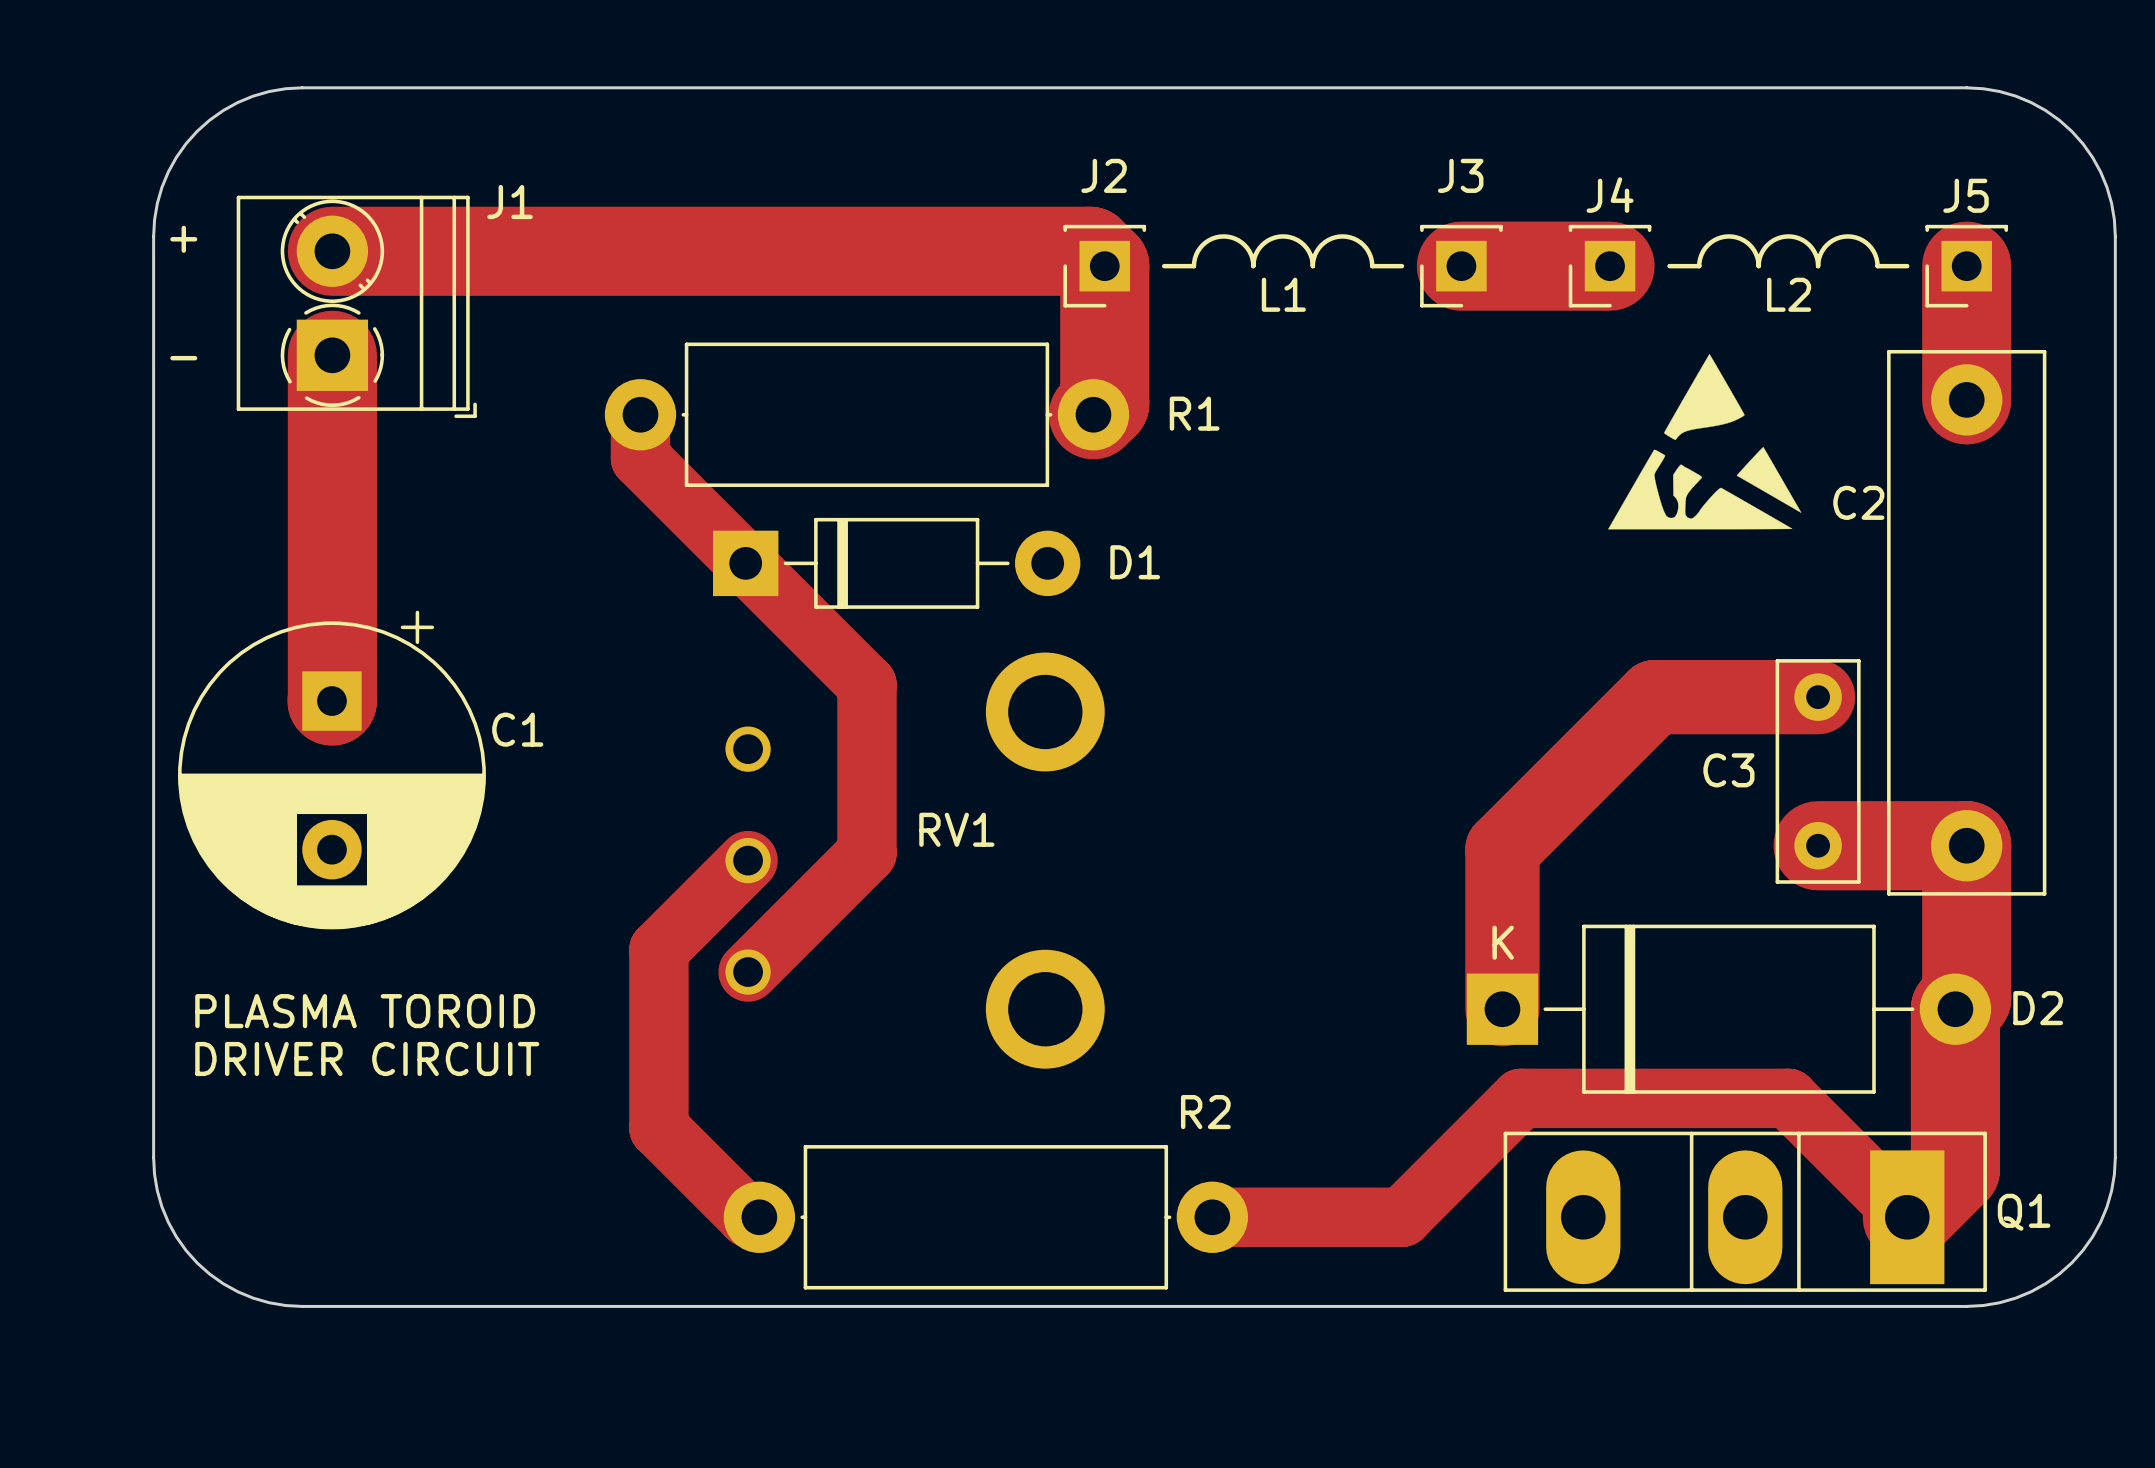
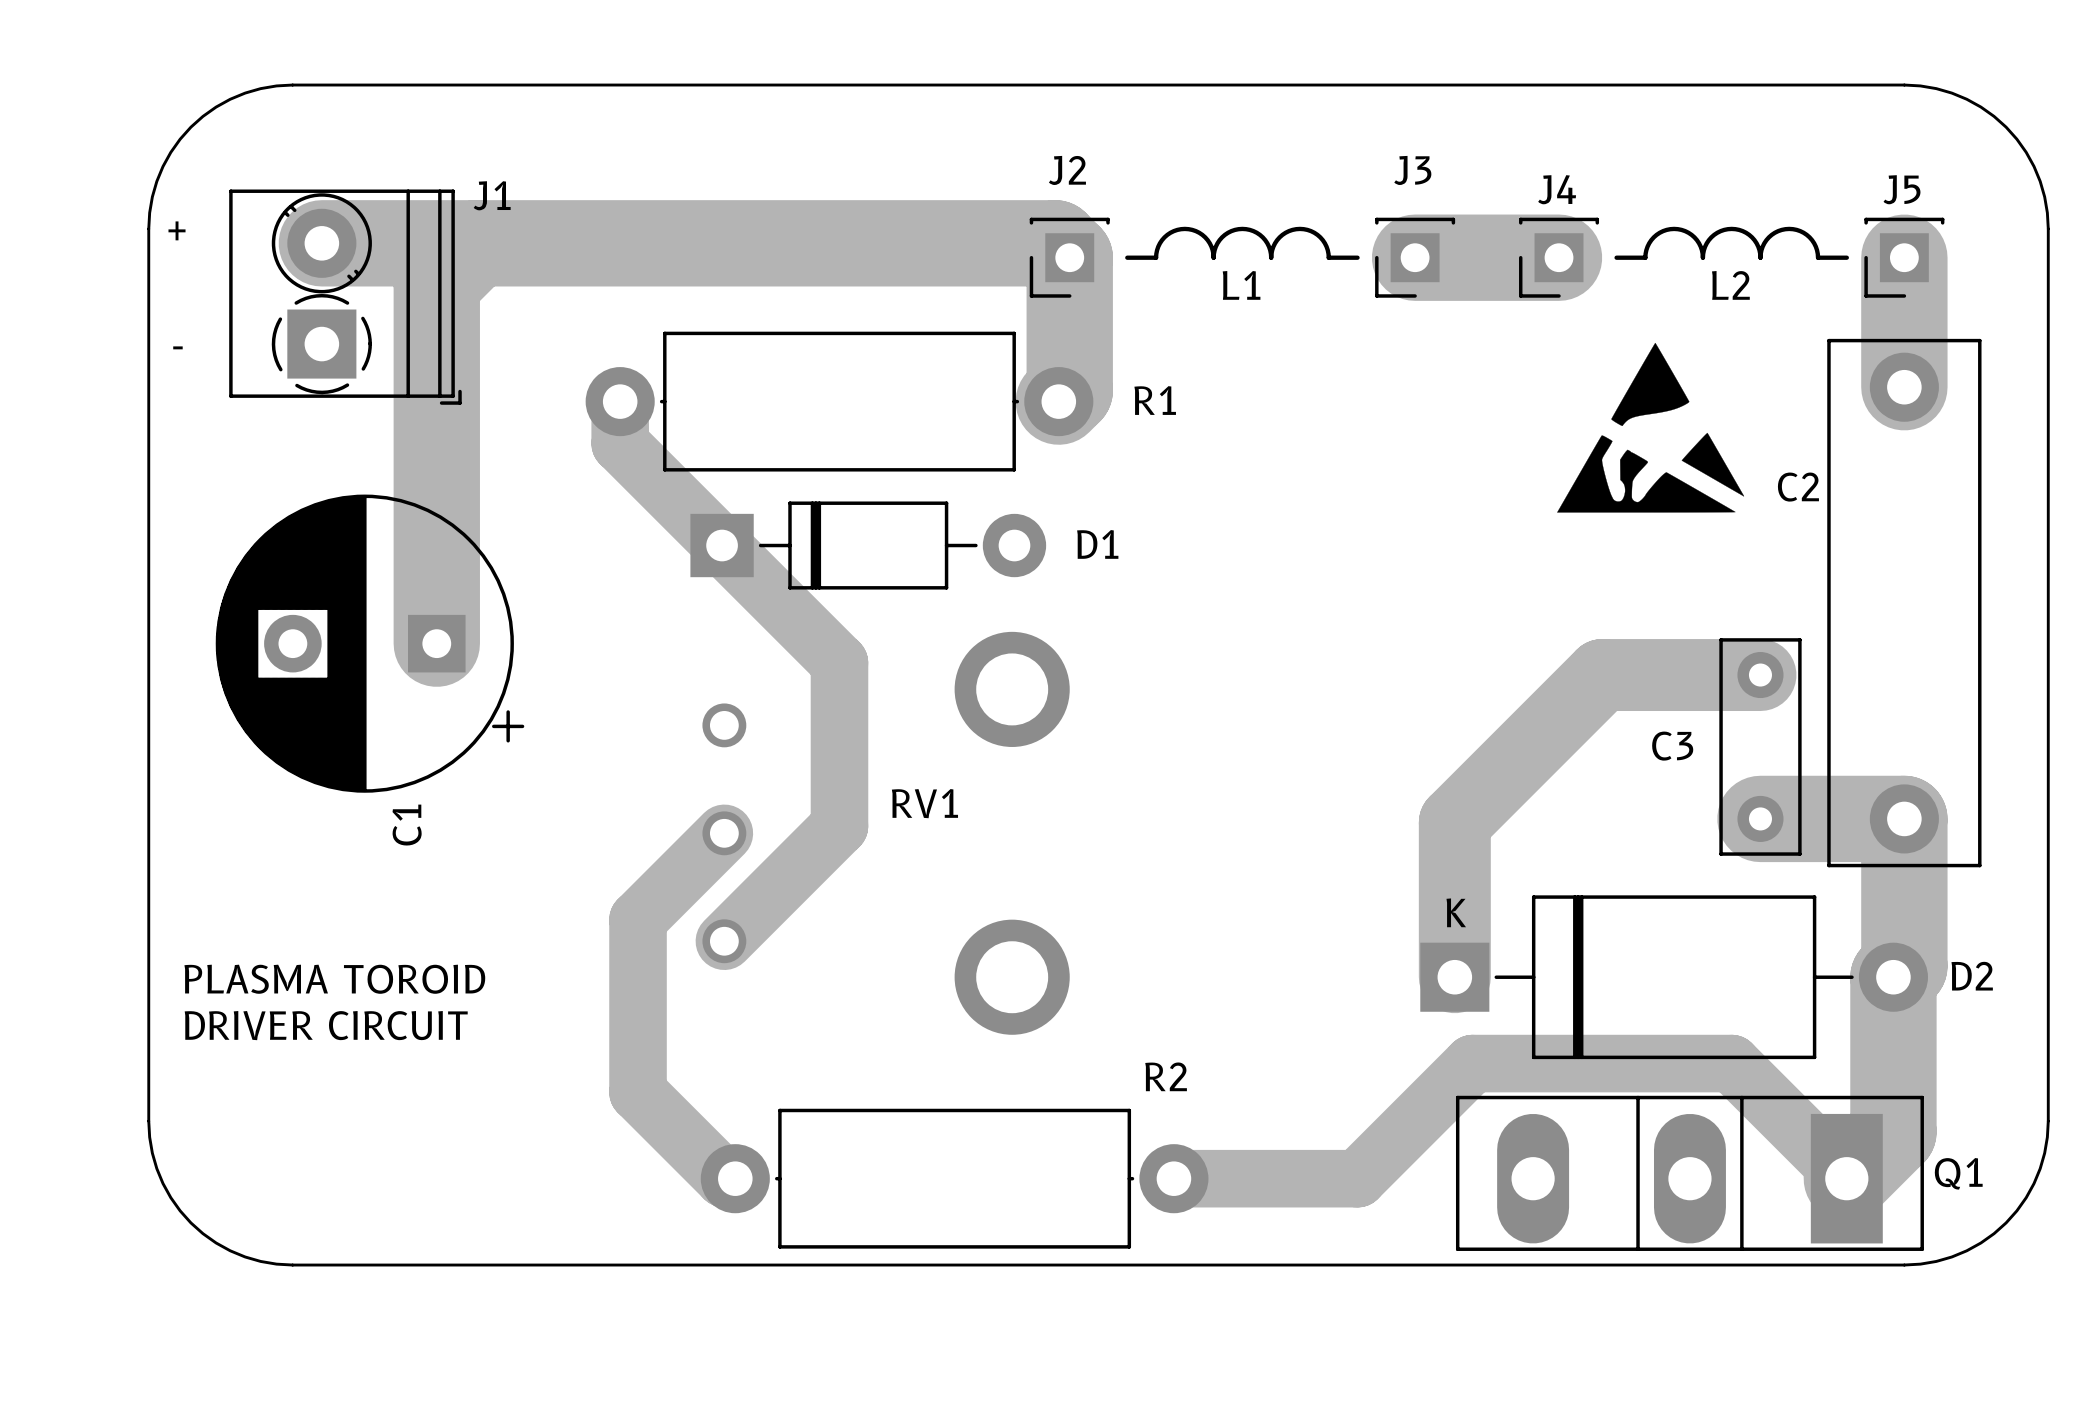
track: none -> (476, 243) (436, 283) (436, 643)
track: (332, 355) (331, 701) -> none
C1 rotation: 0° (331, 770) -> 90° clockwise (370, 643)

